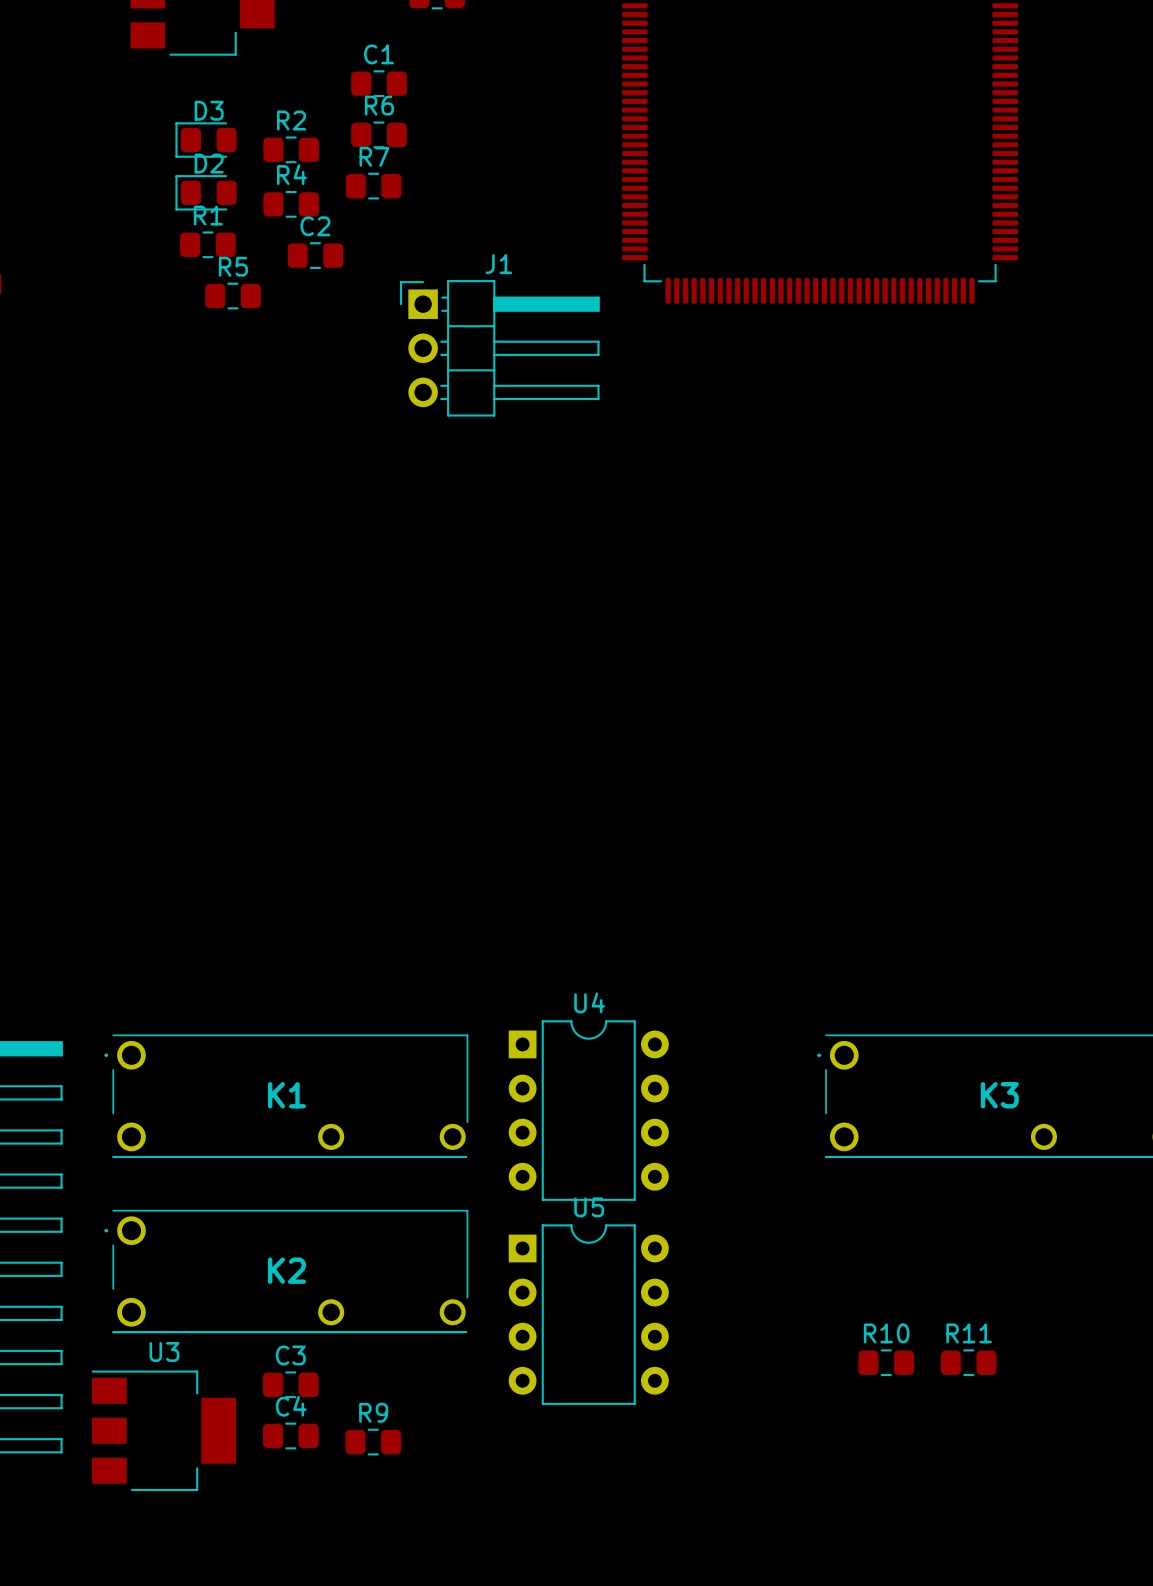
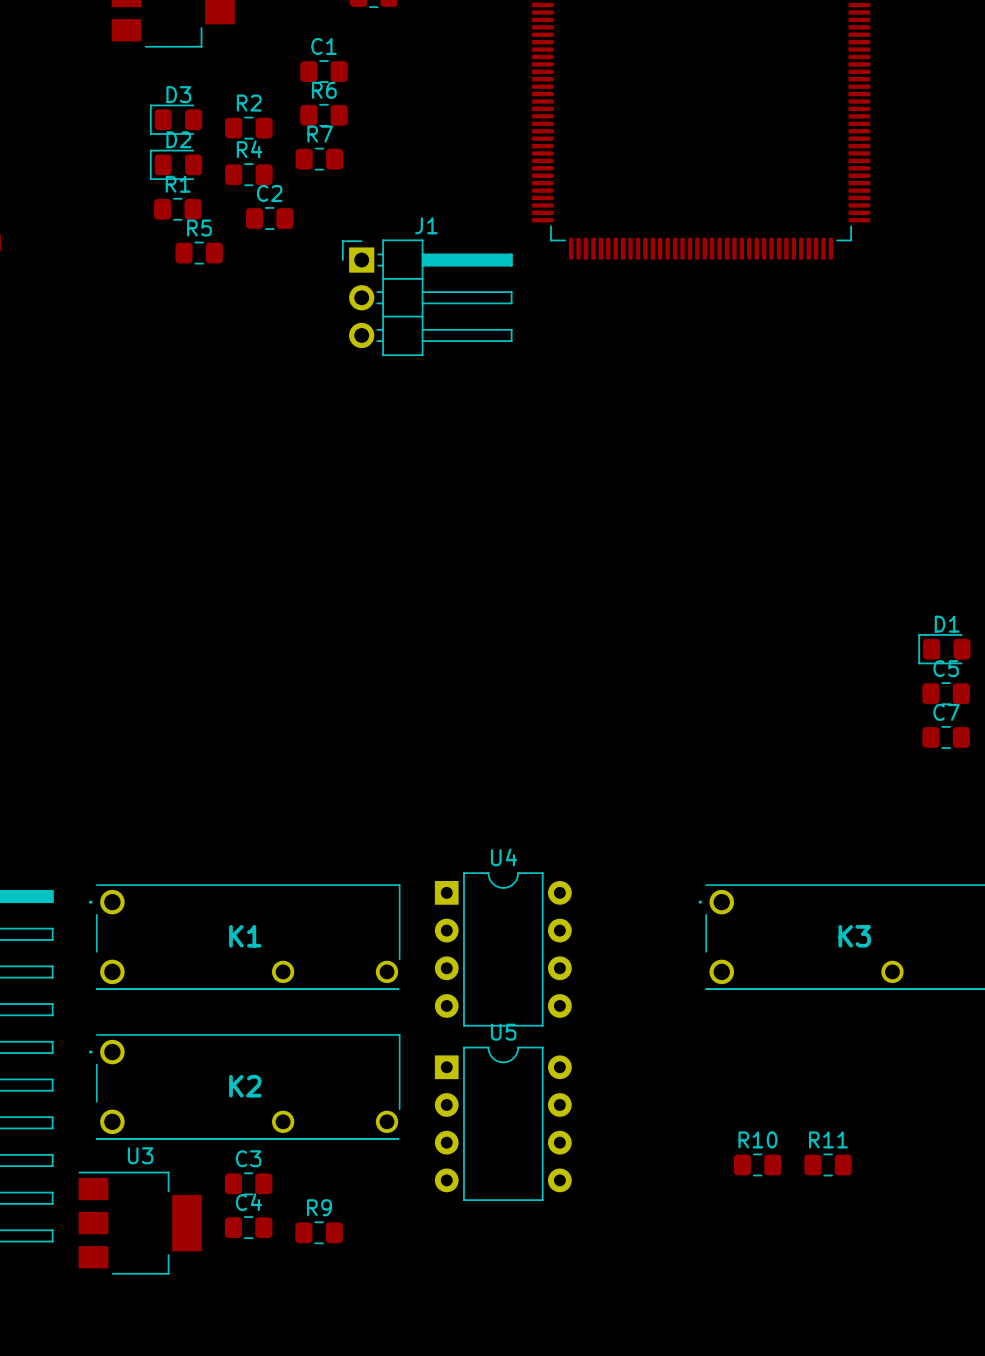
D1: none -> (944, 649)
C5: none -> (946, 693)
C7: none -> (946, 737)

